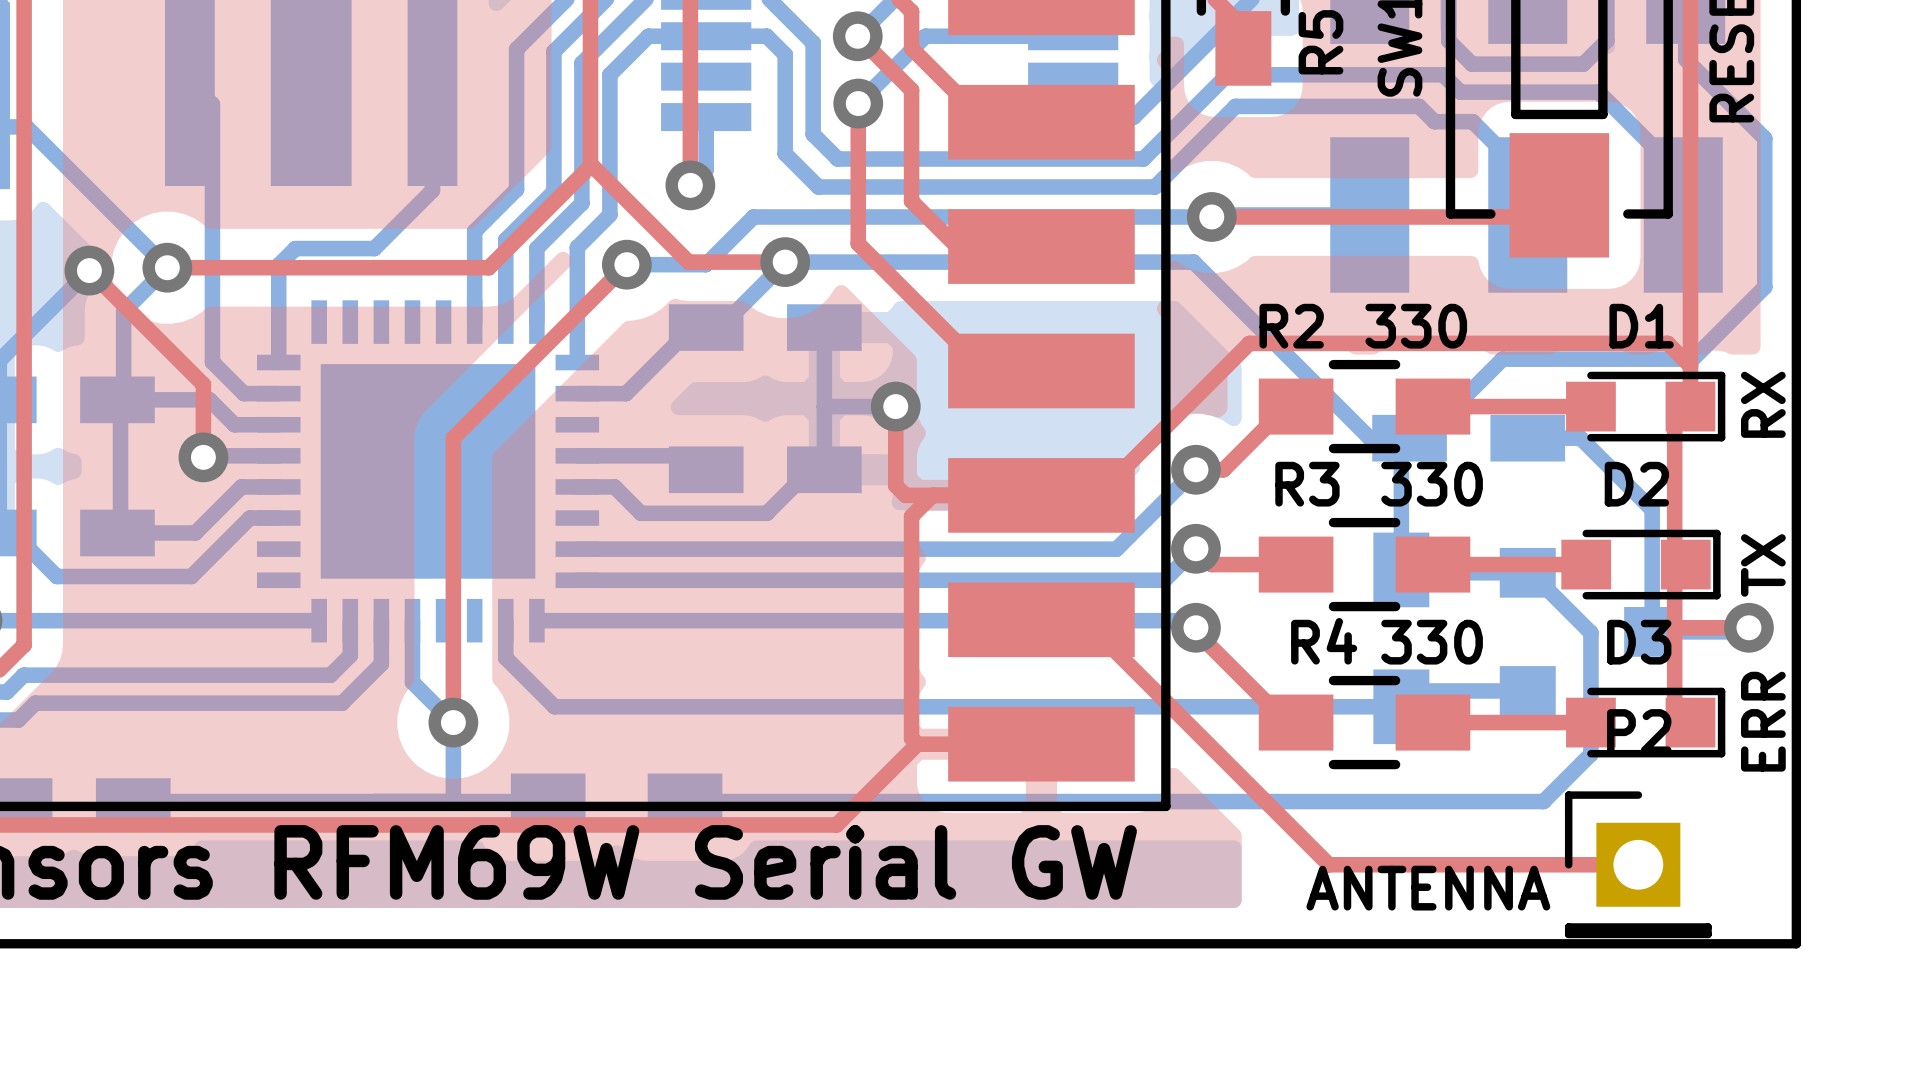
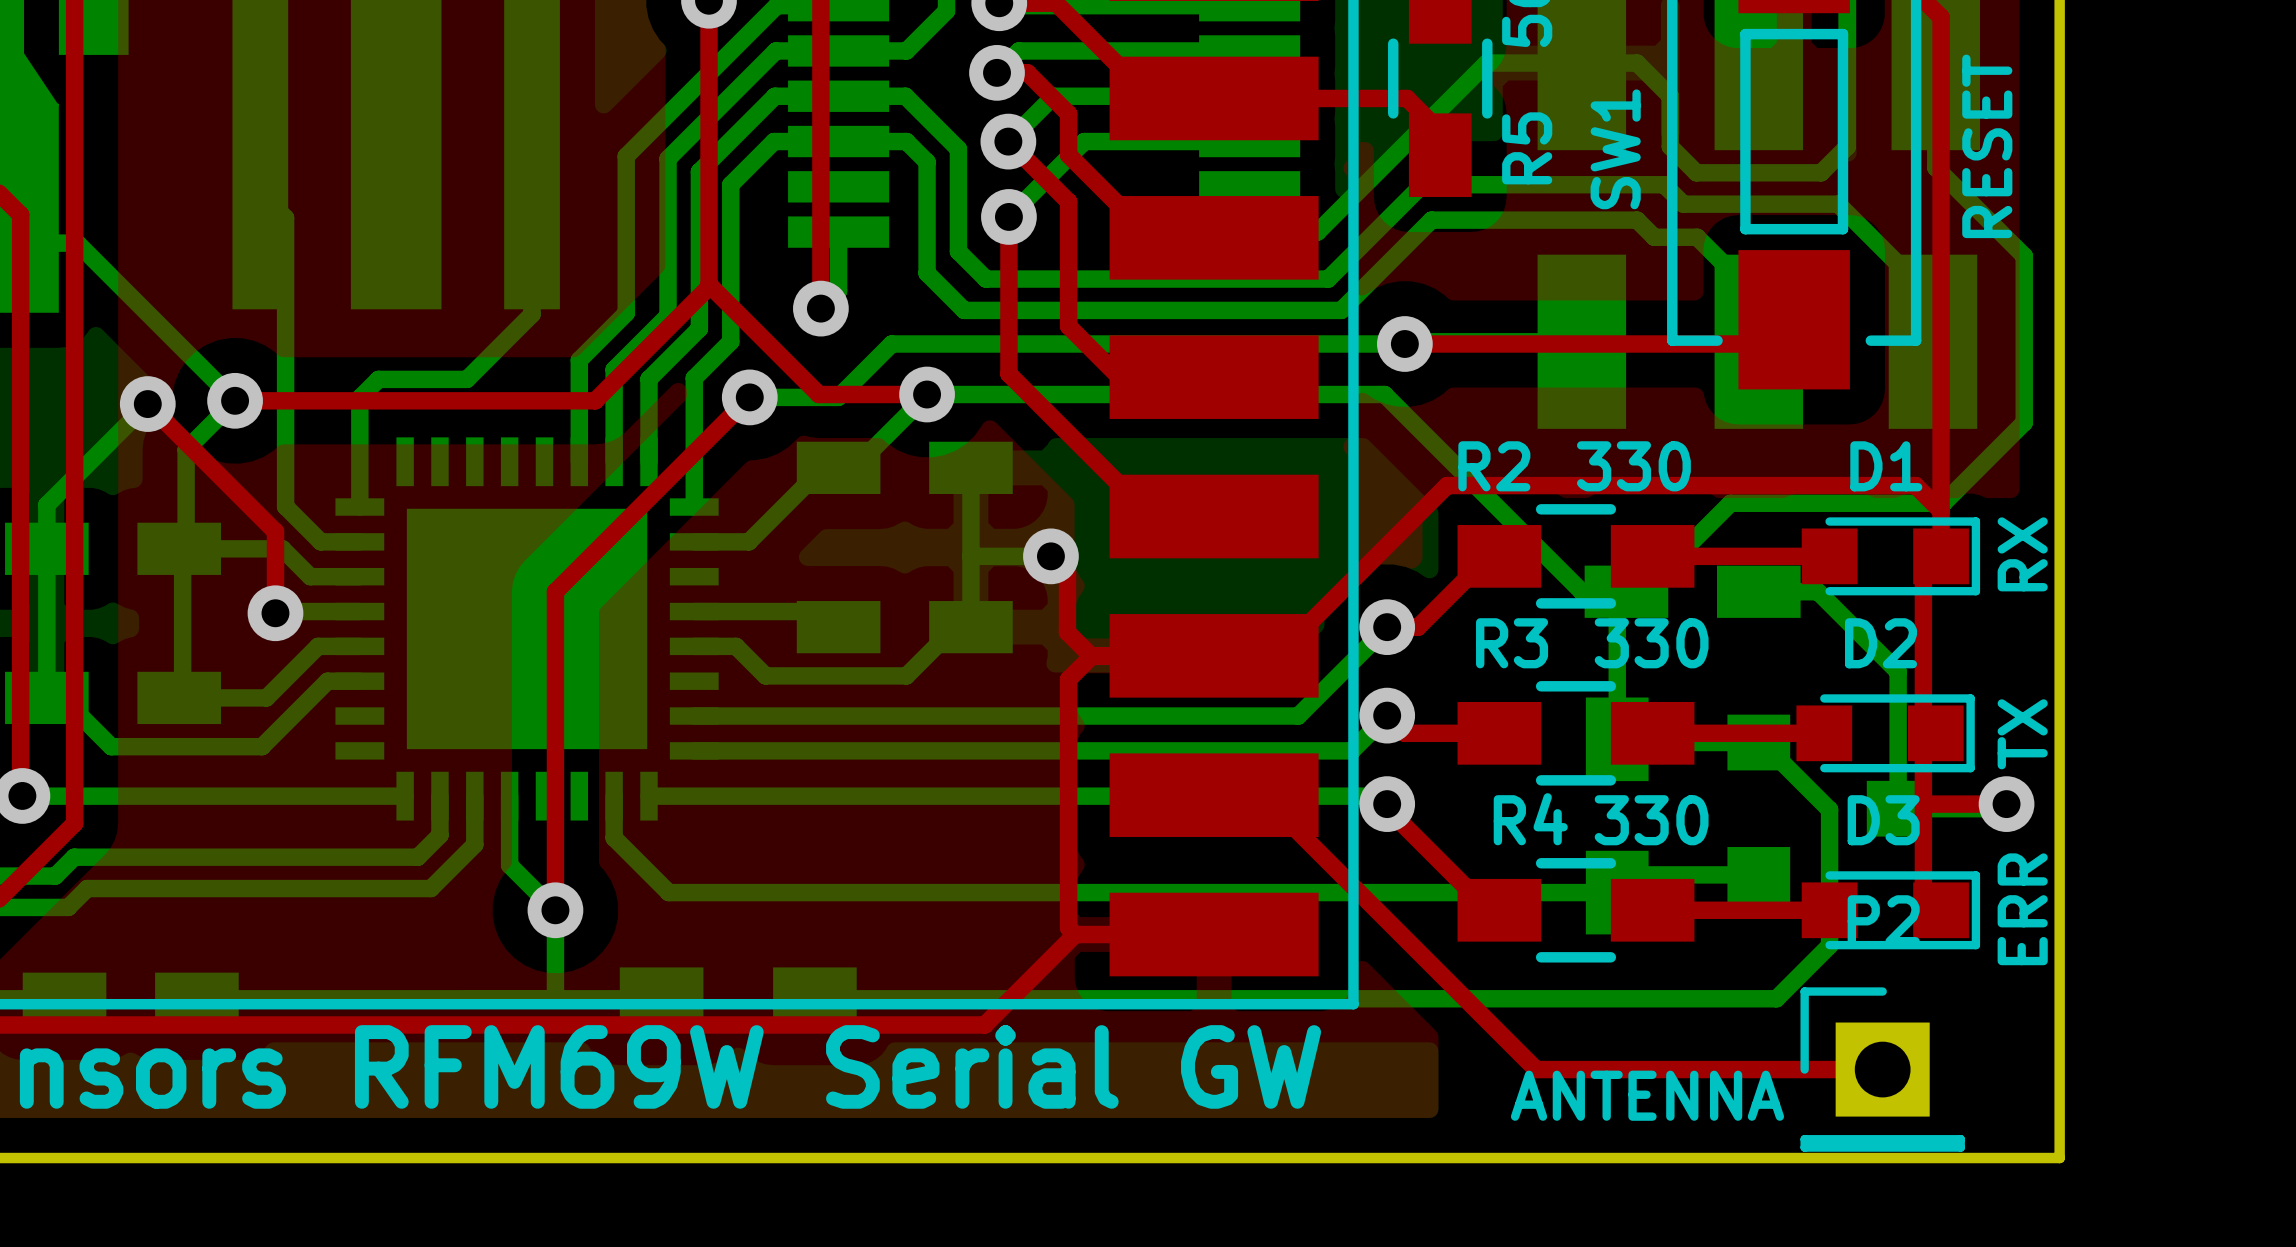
top track: (895, 406) (895, 485) (905, 495) (931, 495) -> (1050, 556) (1067, 572) (1067, 632) (1091, 655)

